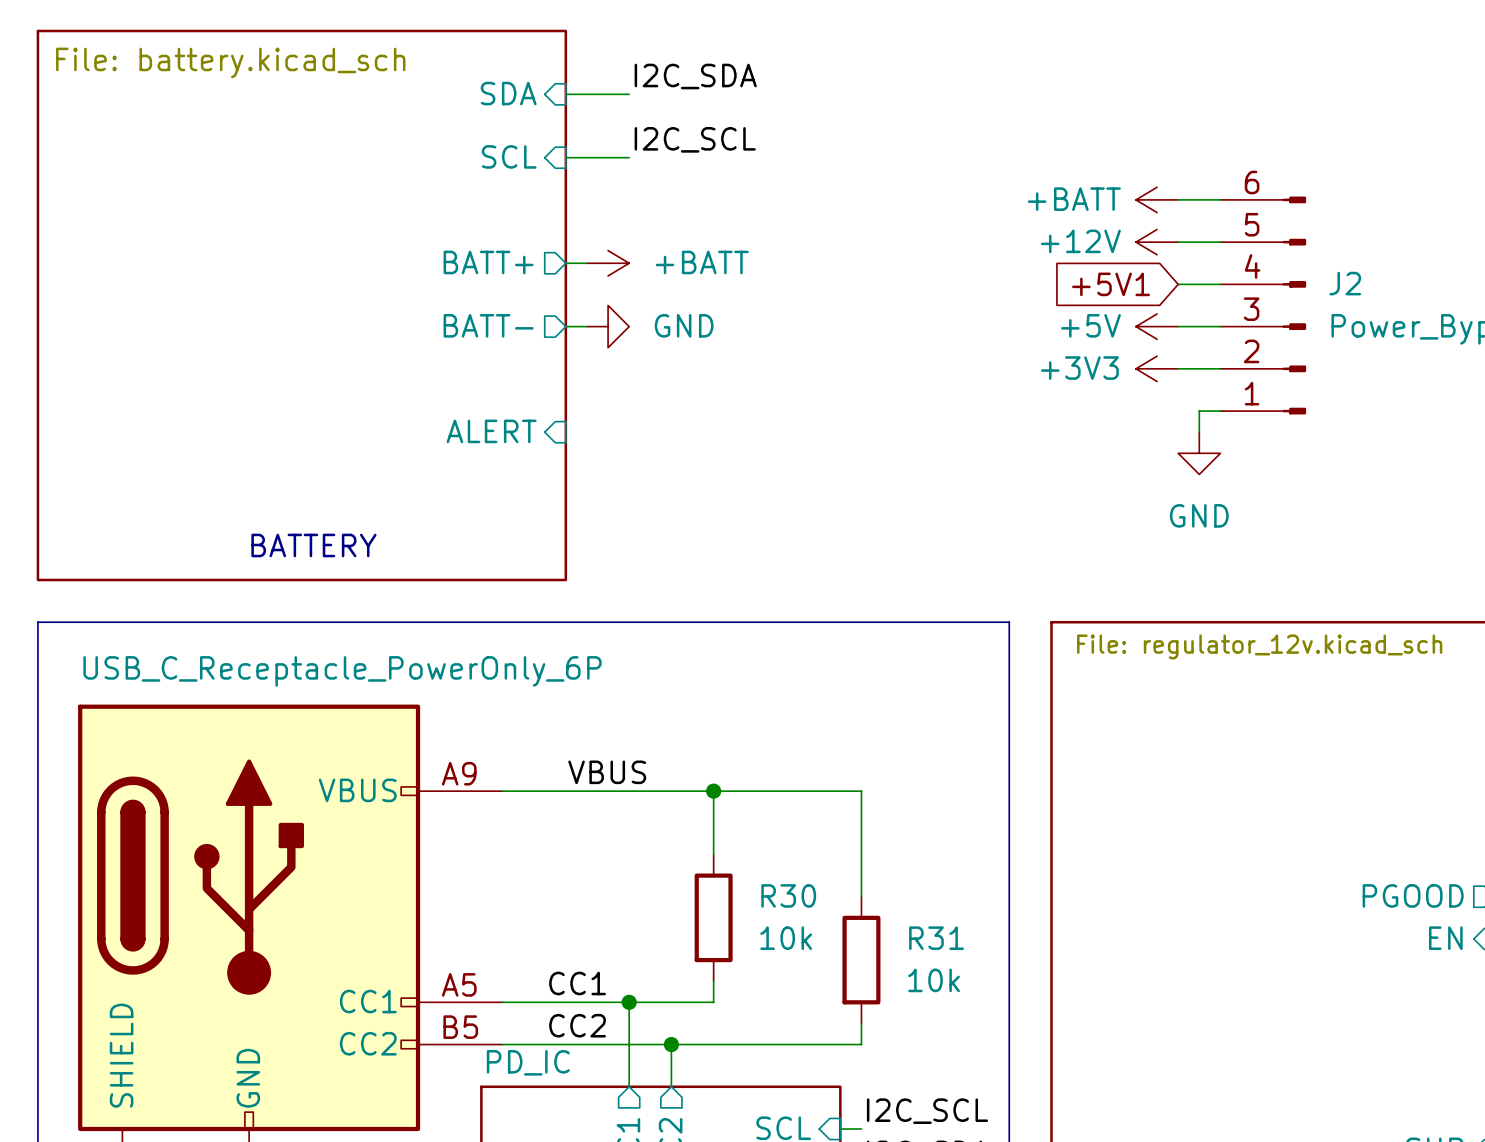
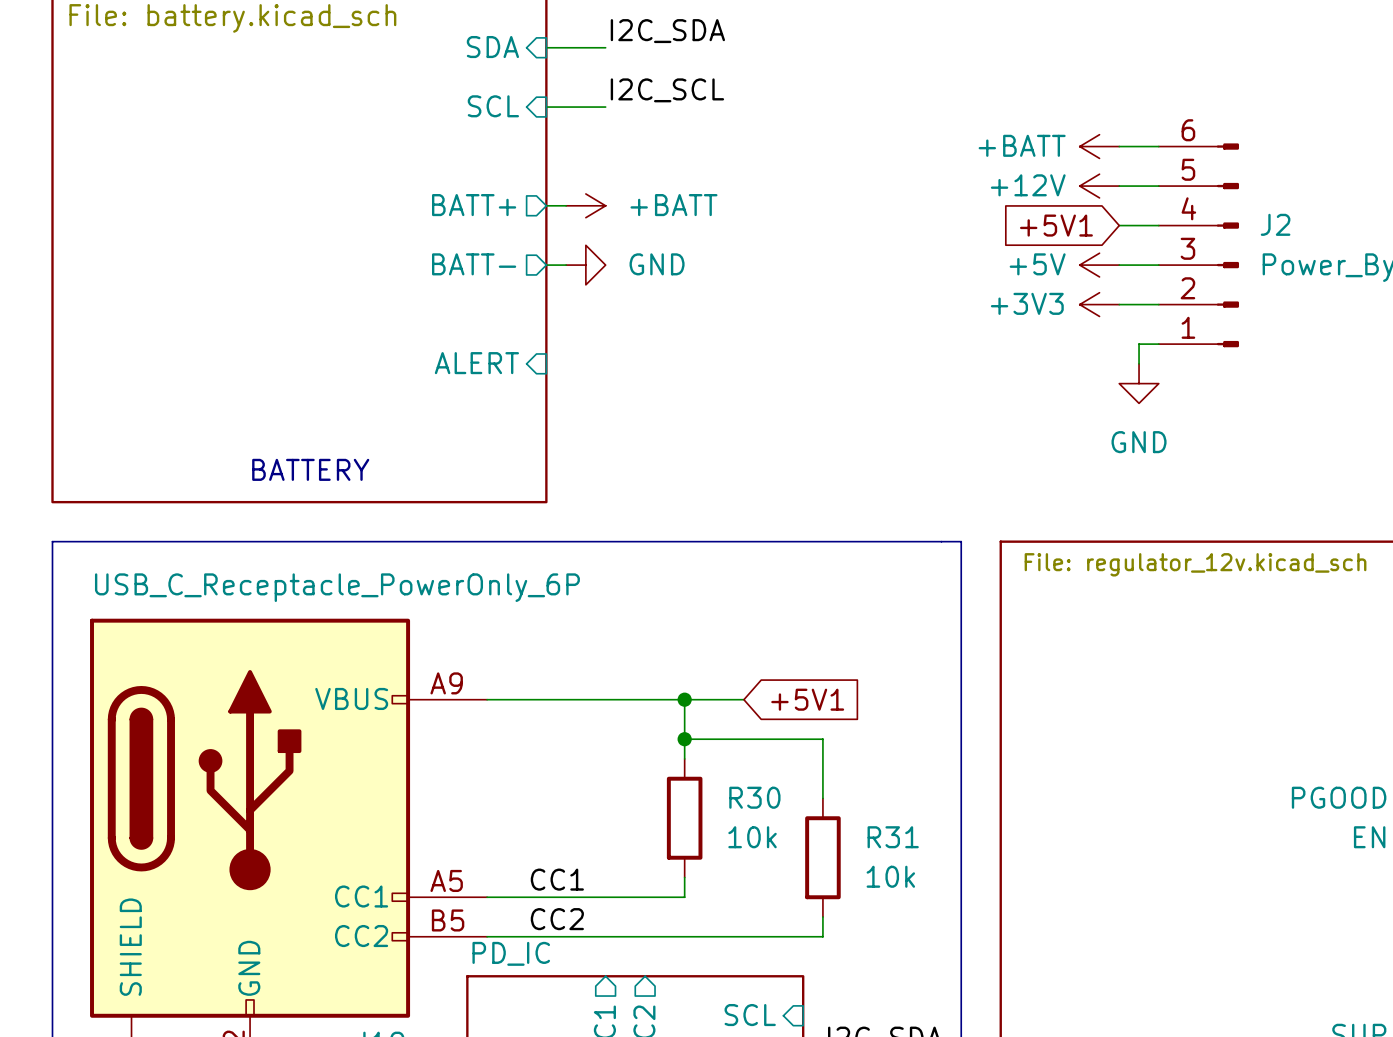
label: VBUS (607, 772) -> none
wire: (776, 791) (861, 791) (861, 833) -> (684, 739) (822, 739)
global label: none -> +5V1 (807, 699)
junction: none -> (684, 739)
wire: (629, 1002) (629, 1086) -> none
junction: (629, 1002) -> none
wire: (671, 1044) (671, 1086) -> none
junction: (671, 1044) -> none
label: I2C_SCL (927, 1111) -> none
wire: (840, 1129) (861, 1129) -> none

